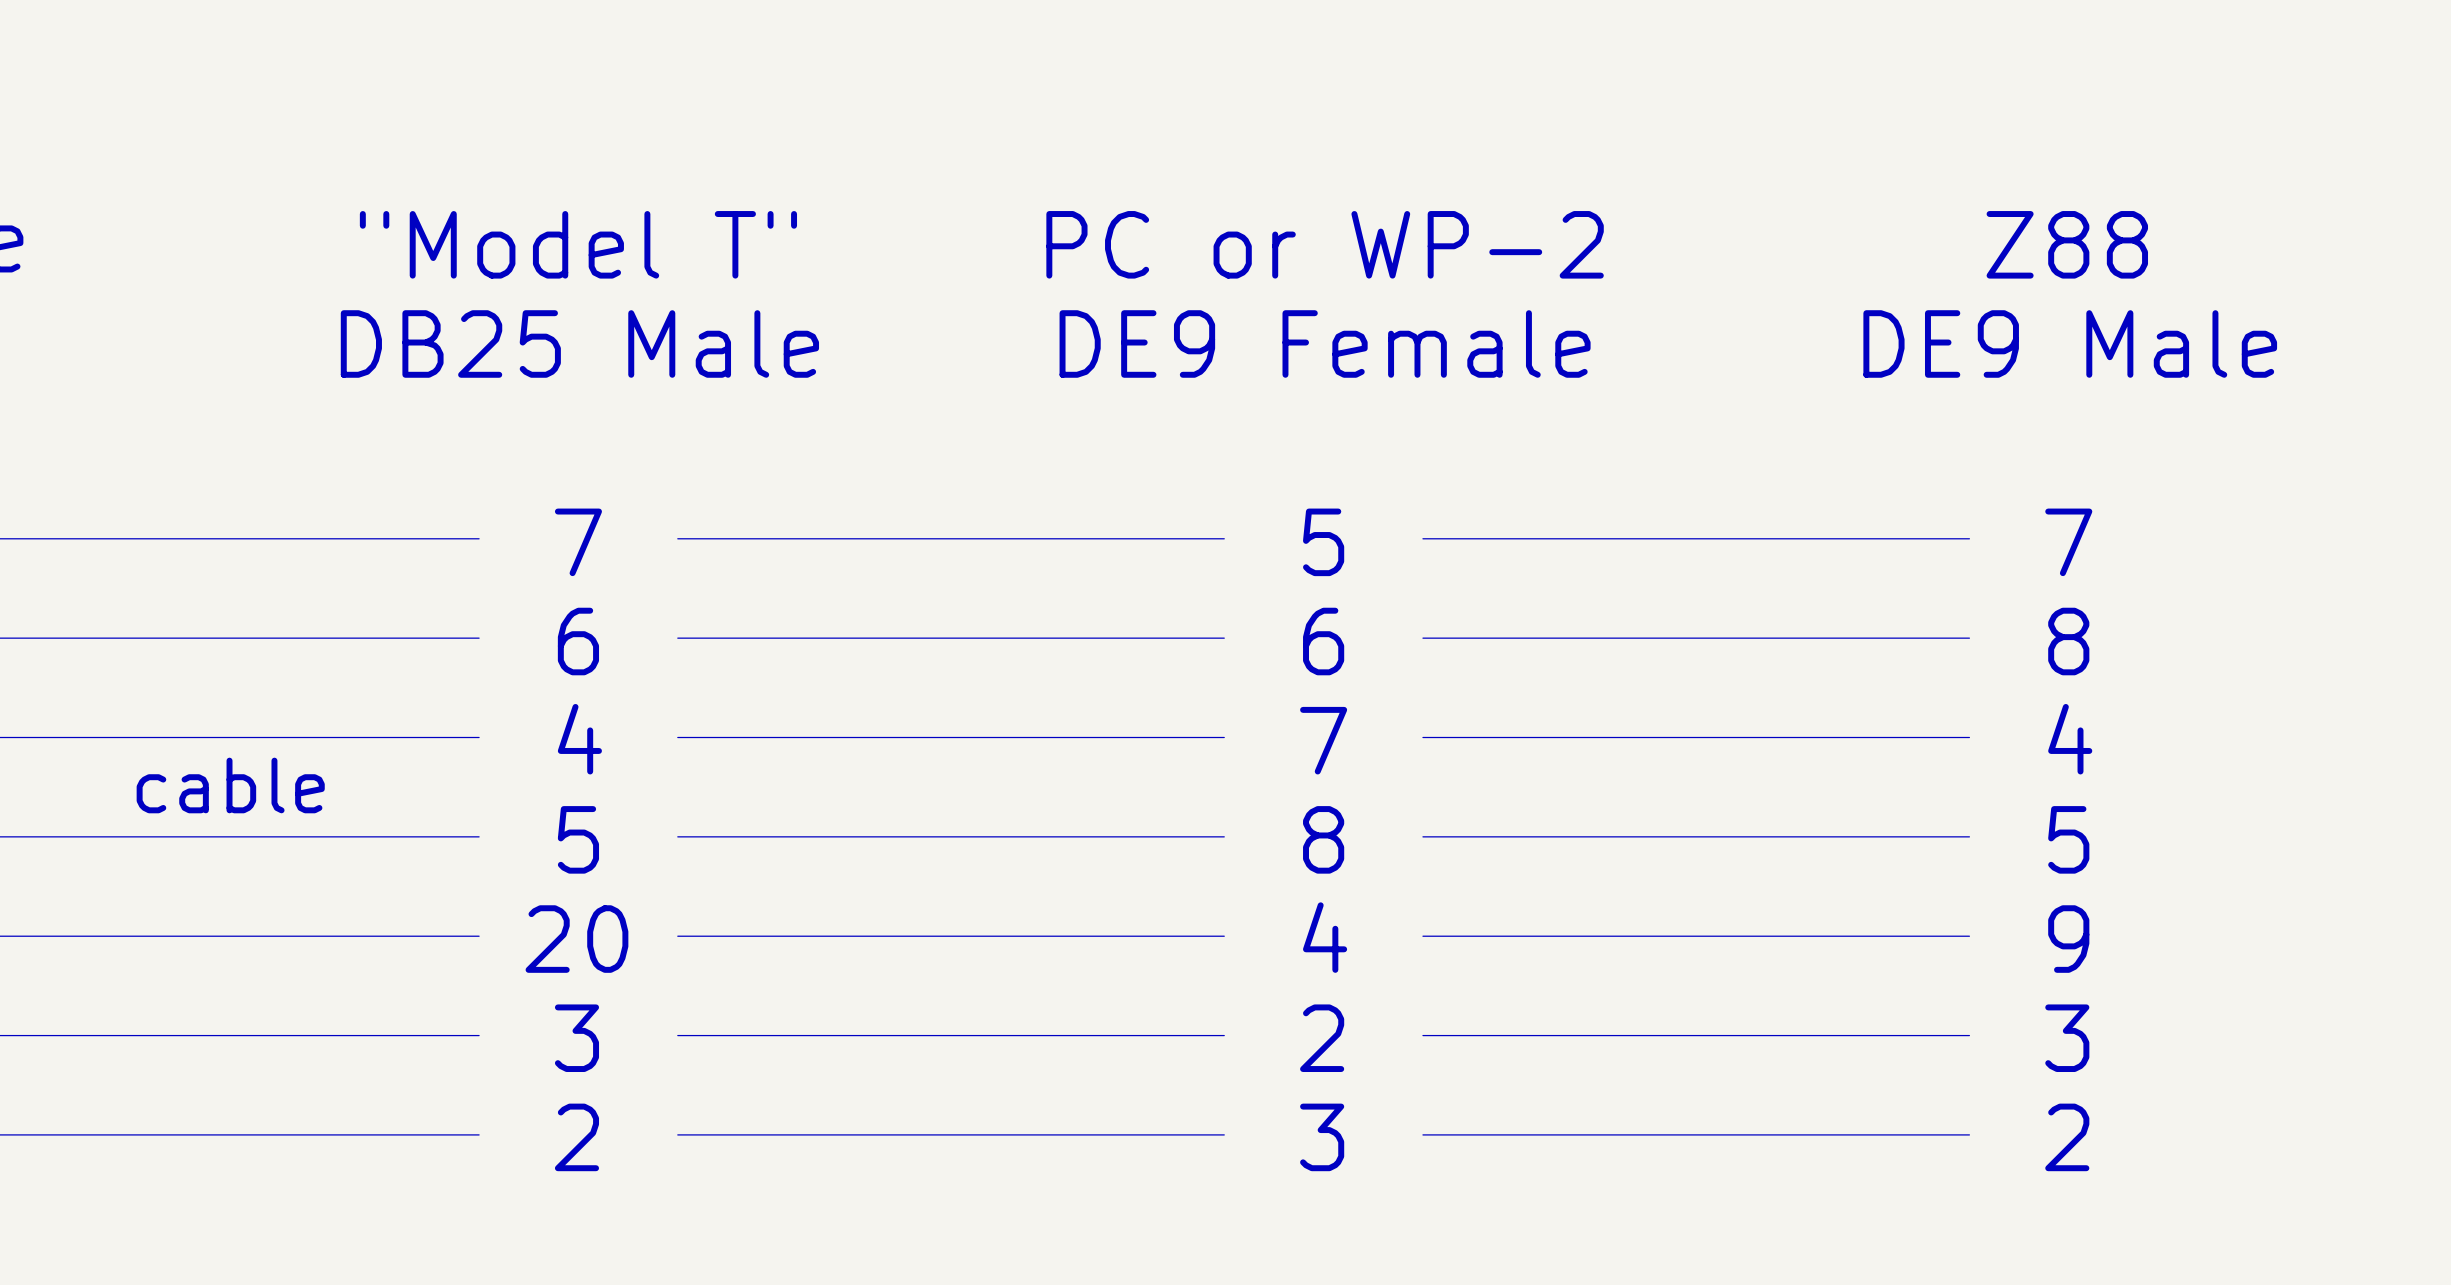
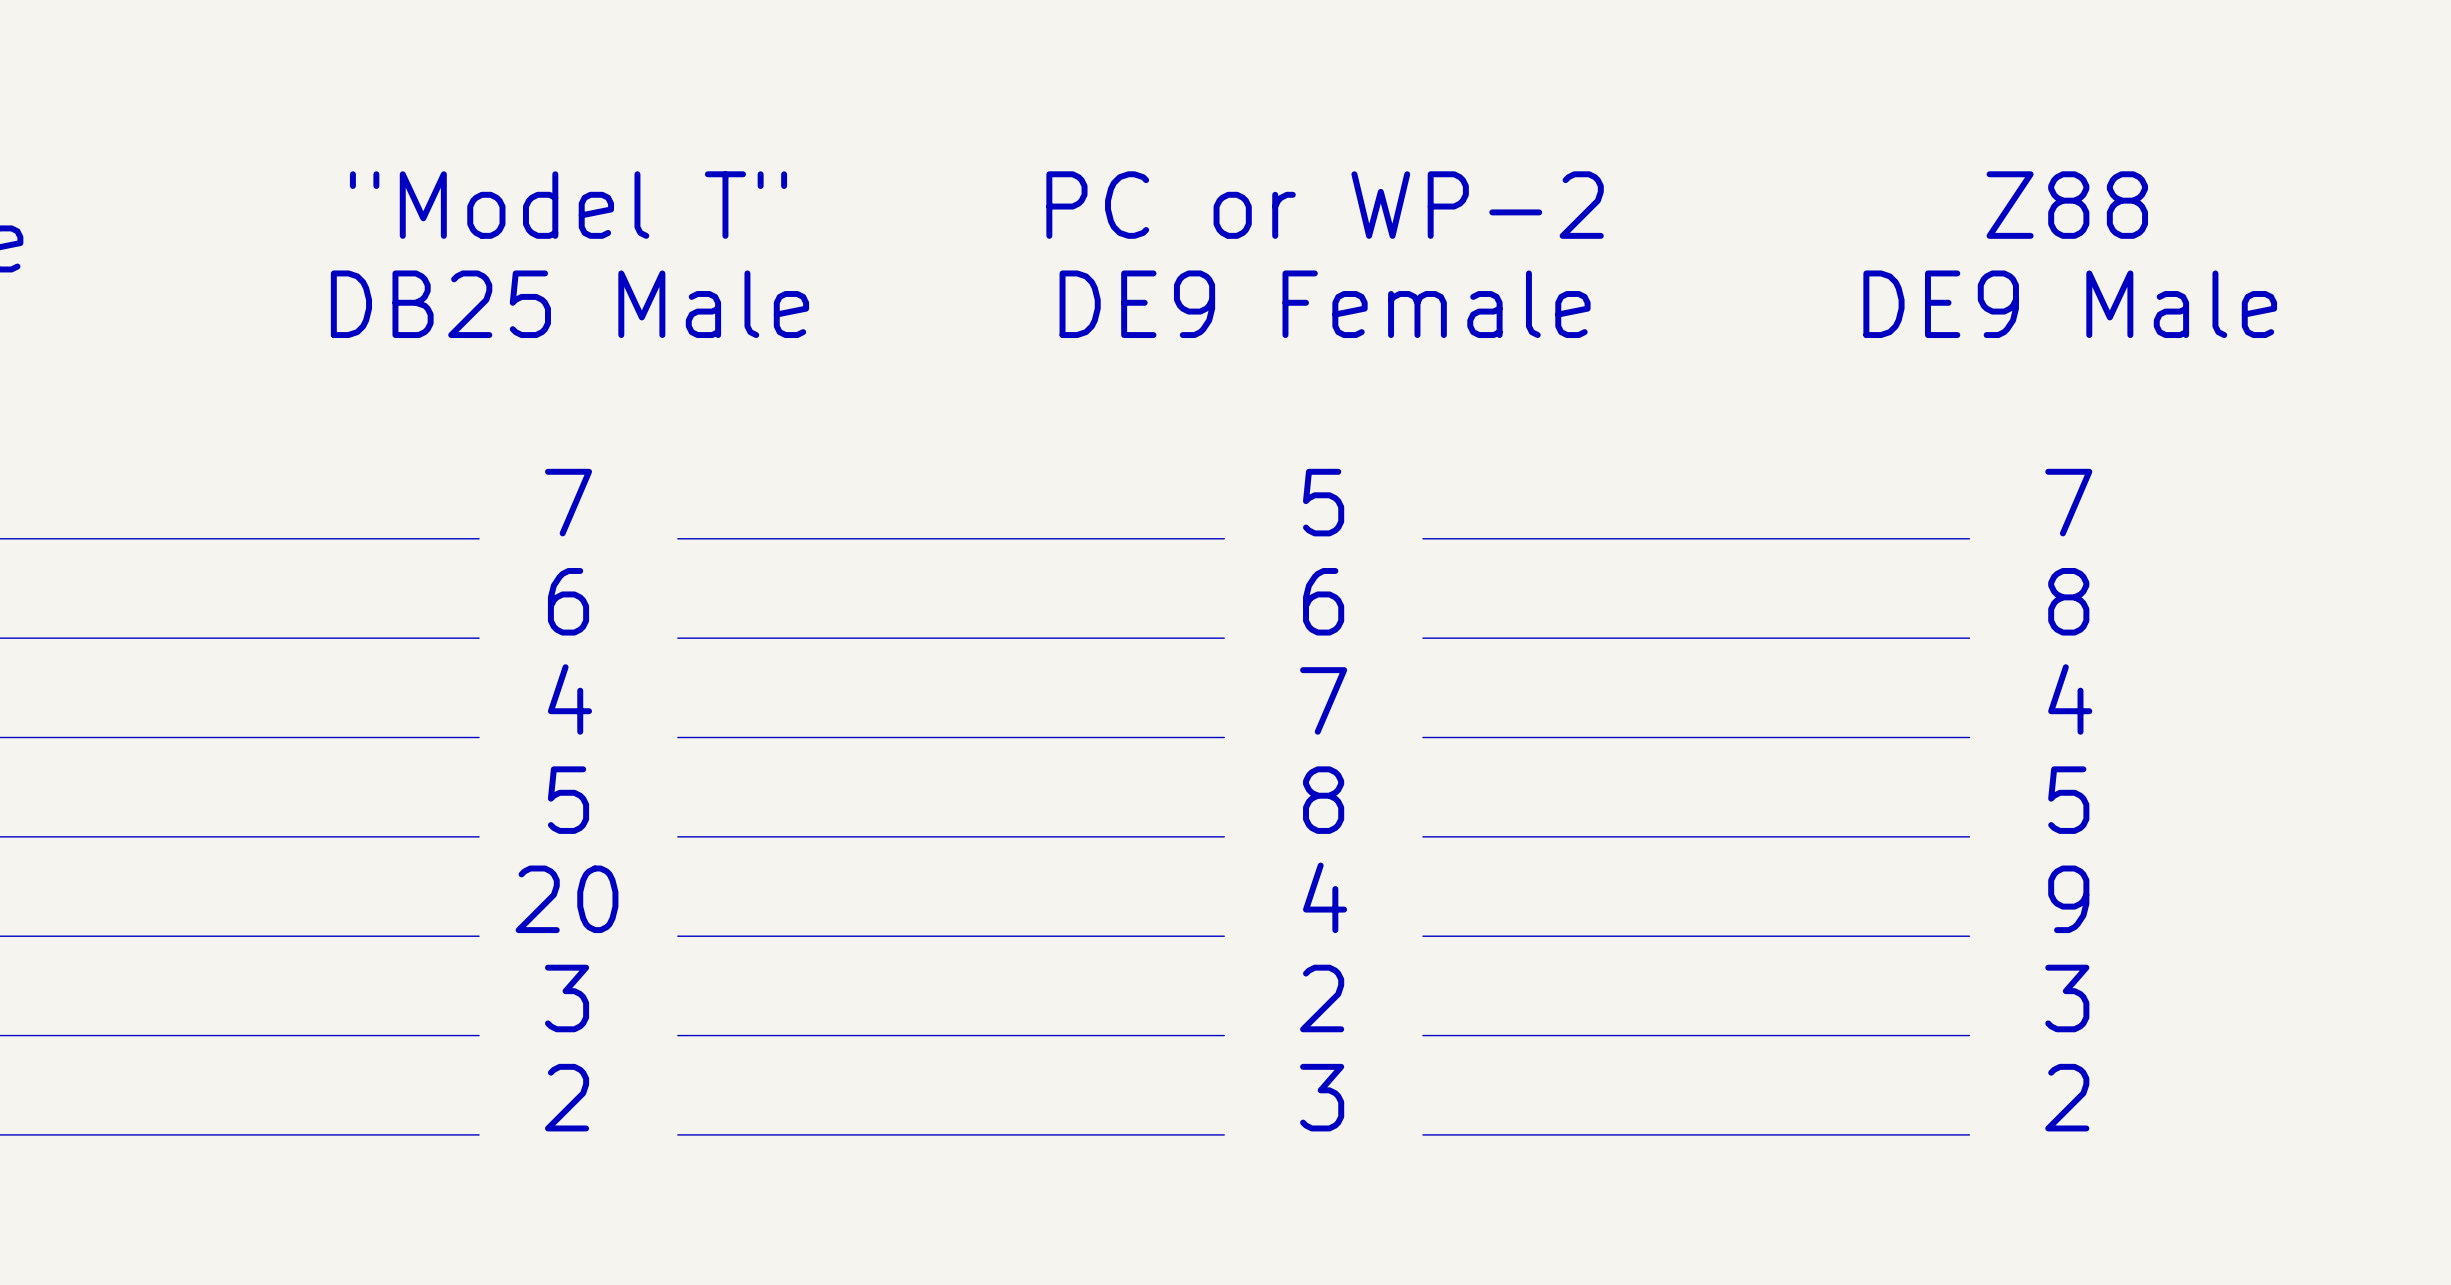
text position: "Model T" (578, 244) -> "Model T" (568, 205)
text position: PC or WP-2 (1325, 244) -> PC or WP-2 (1325, 205)
text position: Z88 (2067, 244) -> Z88 (2067, 205)
text position: DB25 Male (579, 343) -> DB25 Male (569, 304)
text position: DE9 Female (1325, 343) -> DE9 Female (1325, 304)
text position: DE9 Male (2070, 343) -> DE9 Male (2070, 304)
text position: 7 (578, 542) -> 7 (568, 502)
text position: 5 (1323, 542) -> 5 (1323, 502)
text position: 7 (2068, 542) -> 7 (2068, 502)
text position: 6 (578, 641) -> 6 (568, 601)
text position: 6 (1323, 641) -> 6 (1323, 601)
text position: 8 (2068, 641) -> 8 (2068, 601)
text position: 4 (579, 739) -> 4 (569, 699)
text position: 4 (2070, 739) -> 4 (2070, 699)
text position: 7 (1323, 740) -> 7 (1323, 700)
text: cable (230, 785) -> none
text position: 5 (578, 839) -> 5 (568, 800)
text position: 8 (1323, 839) -> 8 (1323, 800)
text position: 5 (2068, 839) -> 5 (2068, 800)
text position: 4 (1325, 937) -> 4 (1325, 897)
text position: 20 (576, 939) -> 20 (567, 899)
text position: 9 (2068, 939) -> 9 (2068, 899)
text position: 3 (576, 1038) -> 3 (567, 998)
text position: 2 (1322, 1038) -> 2 (1322, 998)
text position: 3 (2067, 1038) -> 3 (2067, 998)
text position: 2 (576, 1137) -> 2 (567, 1097)
text position: 3 (1322, 1137) -> 3 (1322, 1097)
text position: 2 (2067, 1137) -> 2 (2067, 1097)

